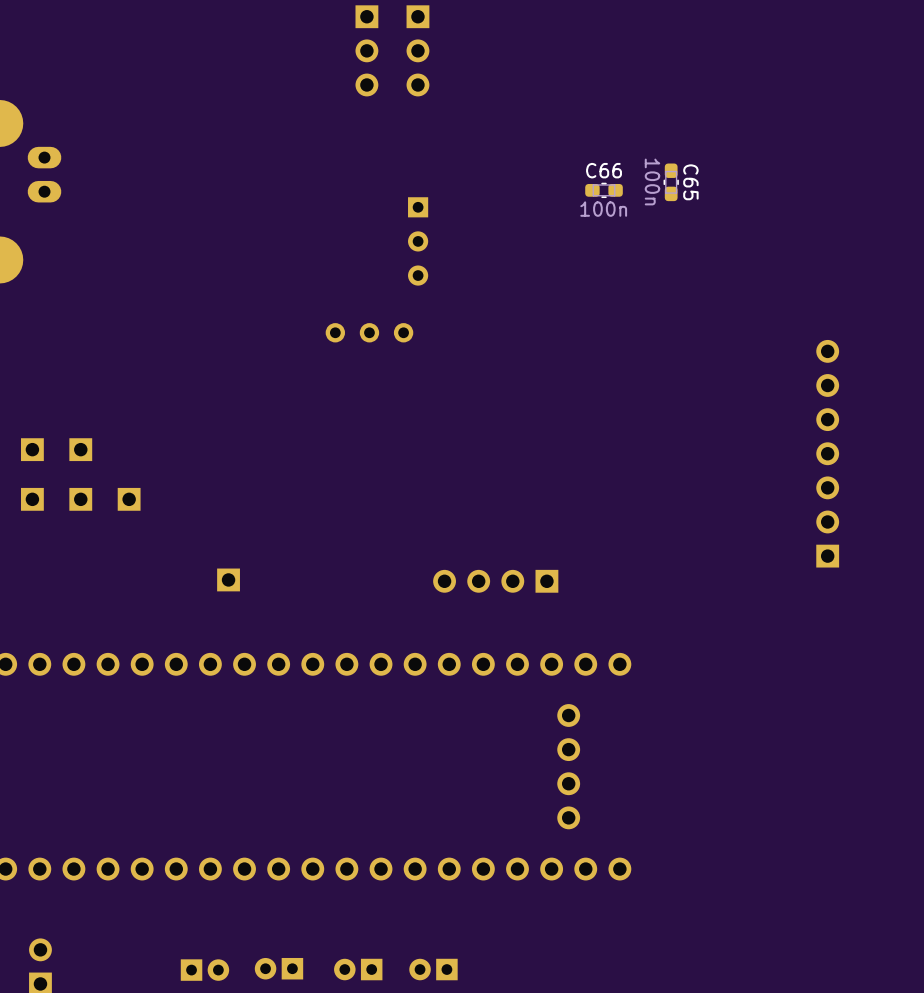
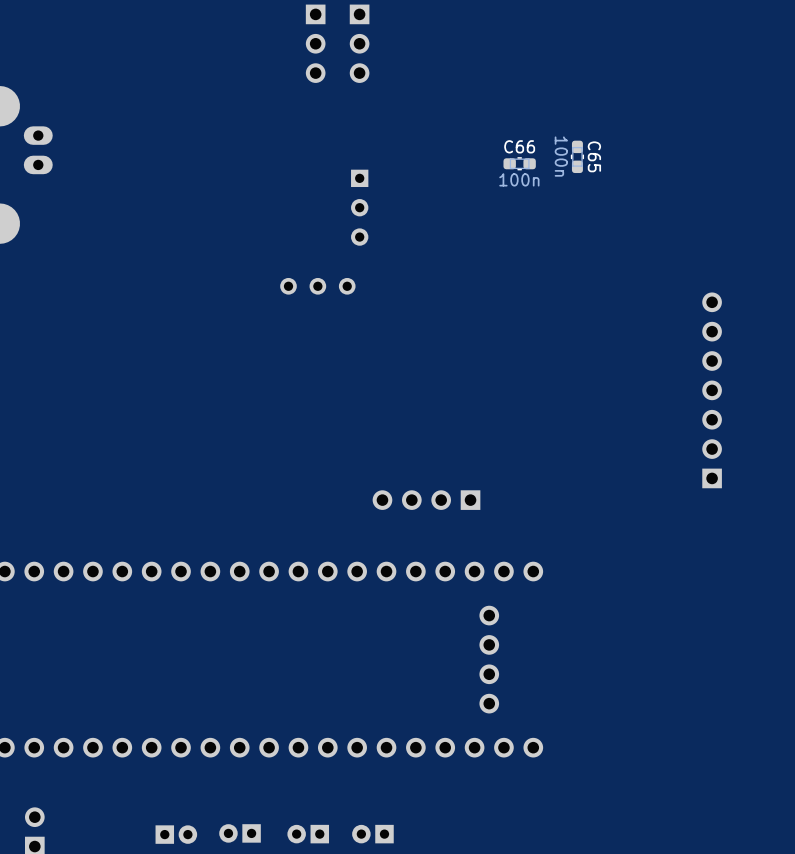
part: (32, 449) -> none
part: (80, 449) -> none
part: (32, 499) -> none
part: (80, 499) -> none
part: (129, 499) -> none
part: (228, 579) -> none

